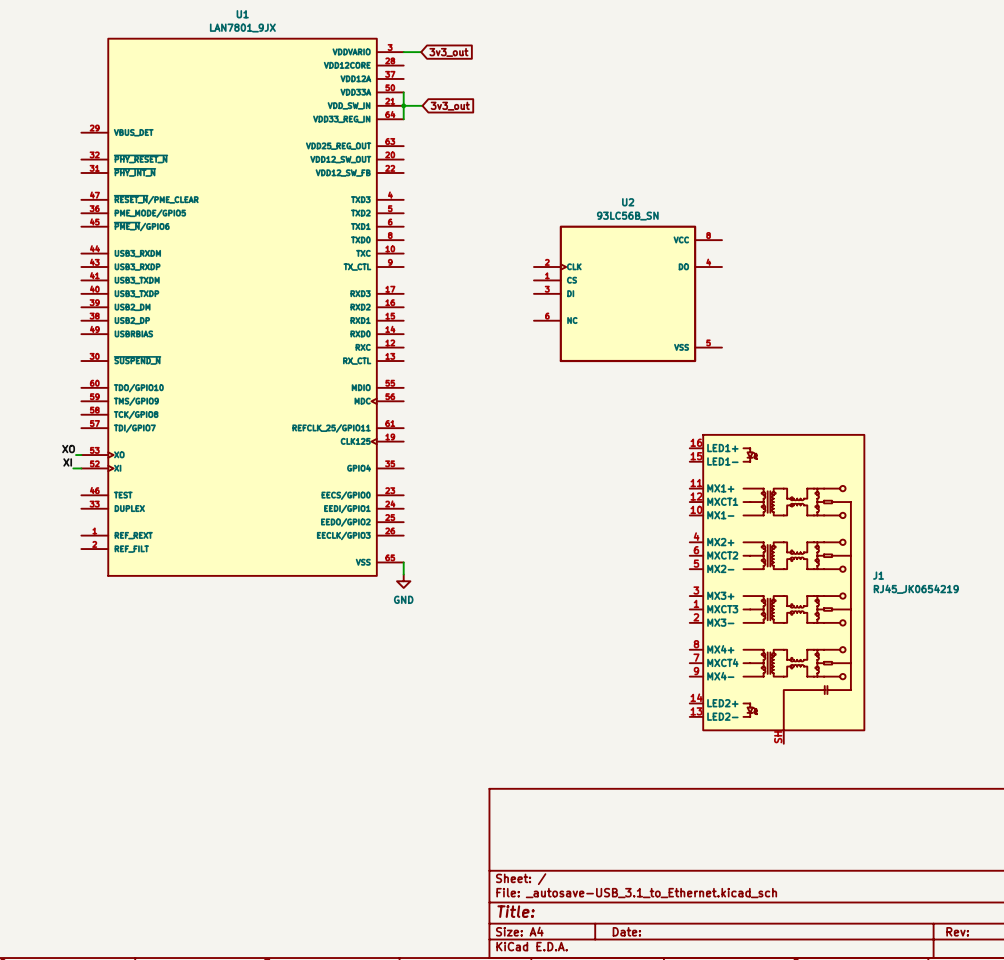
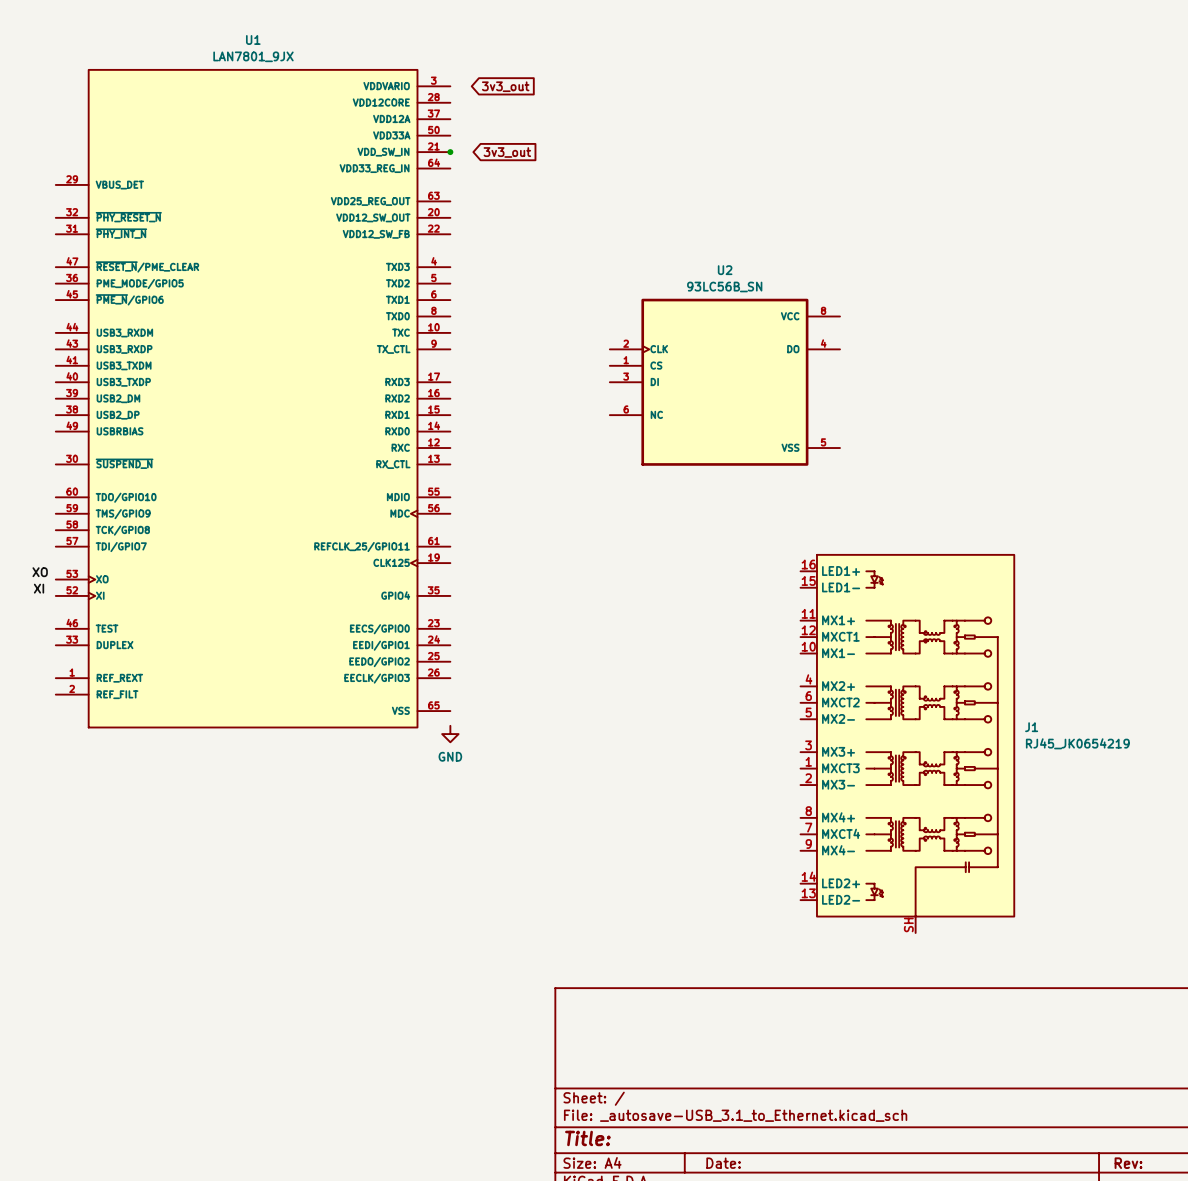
wire: (403, 52) (421, 52) -> none
wire: (403, 92) (403, 119) -> none
wire: (403, 105) (422, 105) -> none
wire: (76, 455) (81, 455) -> none
wire: (73, 468) (81, 468) -> none
wire: (403, 562) (403, 574) -> none

